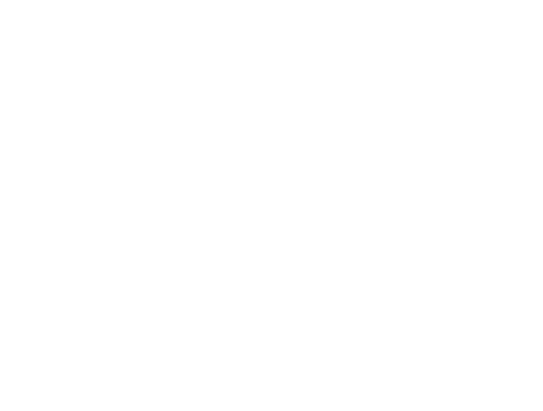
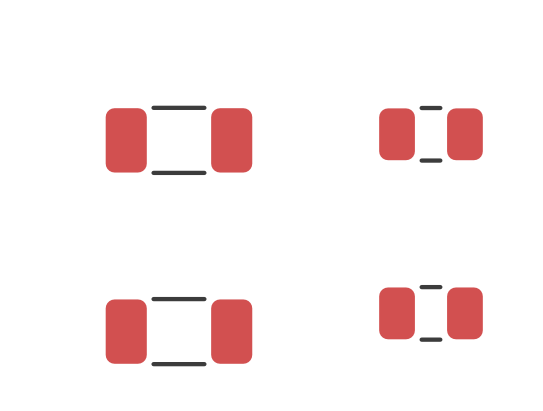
part: none -> (430, 134)
part: none -> (178, 140)
part: none -> (430, 313)
part: none -> (178, 331)

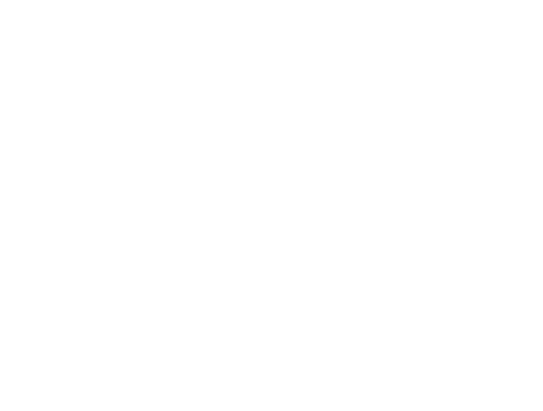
part: (430, 134) -> none
part: (178, 140) -> none
part: (430, 313) -> none
part: (178, 331) -> none

